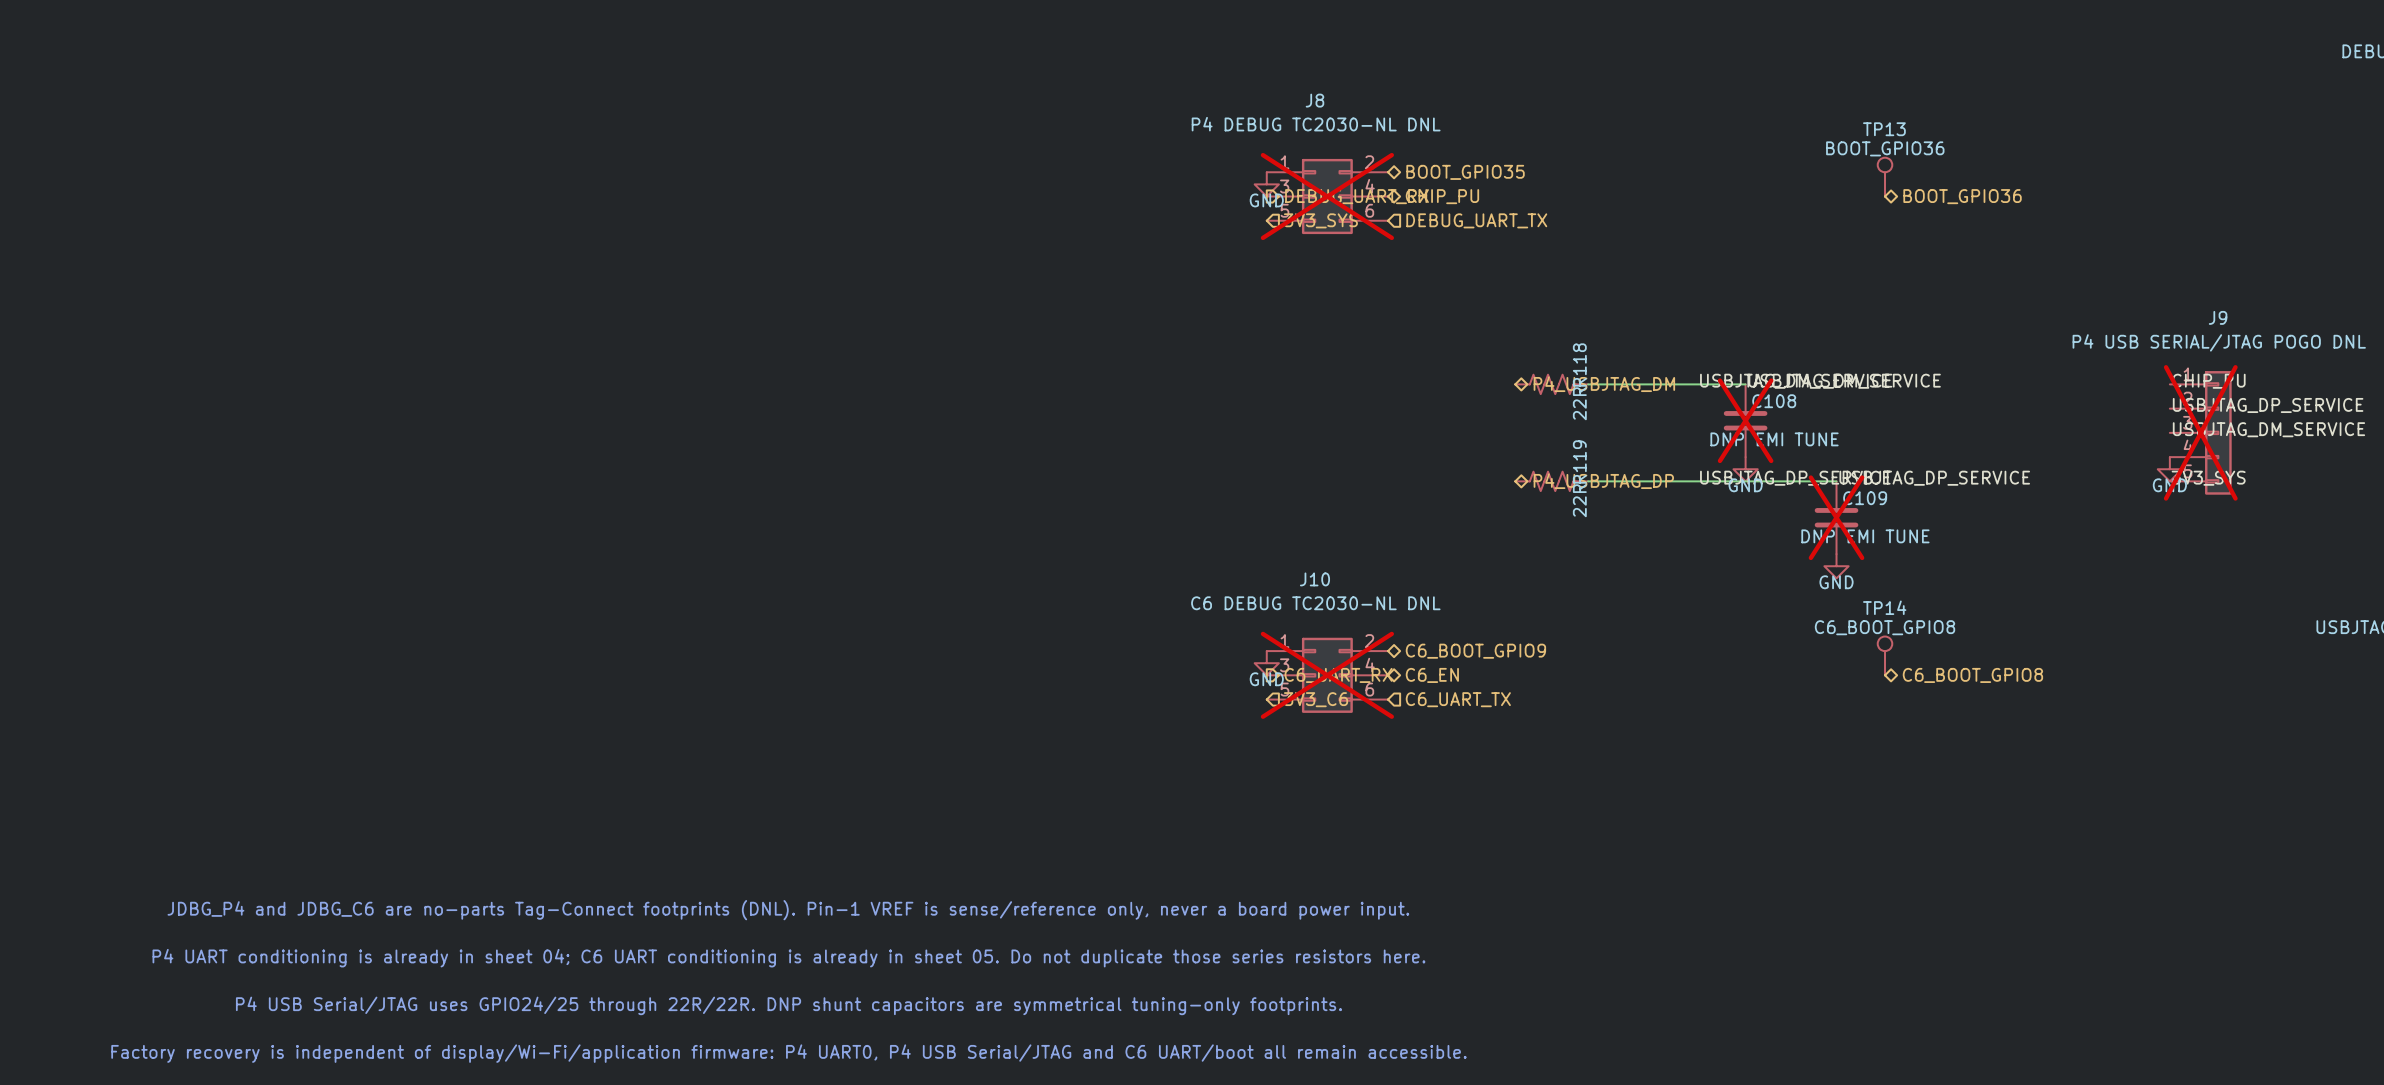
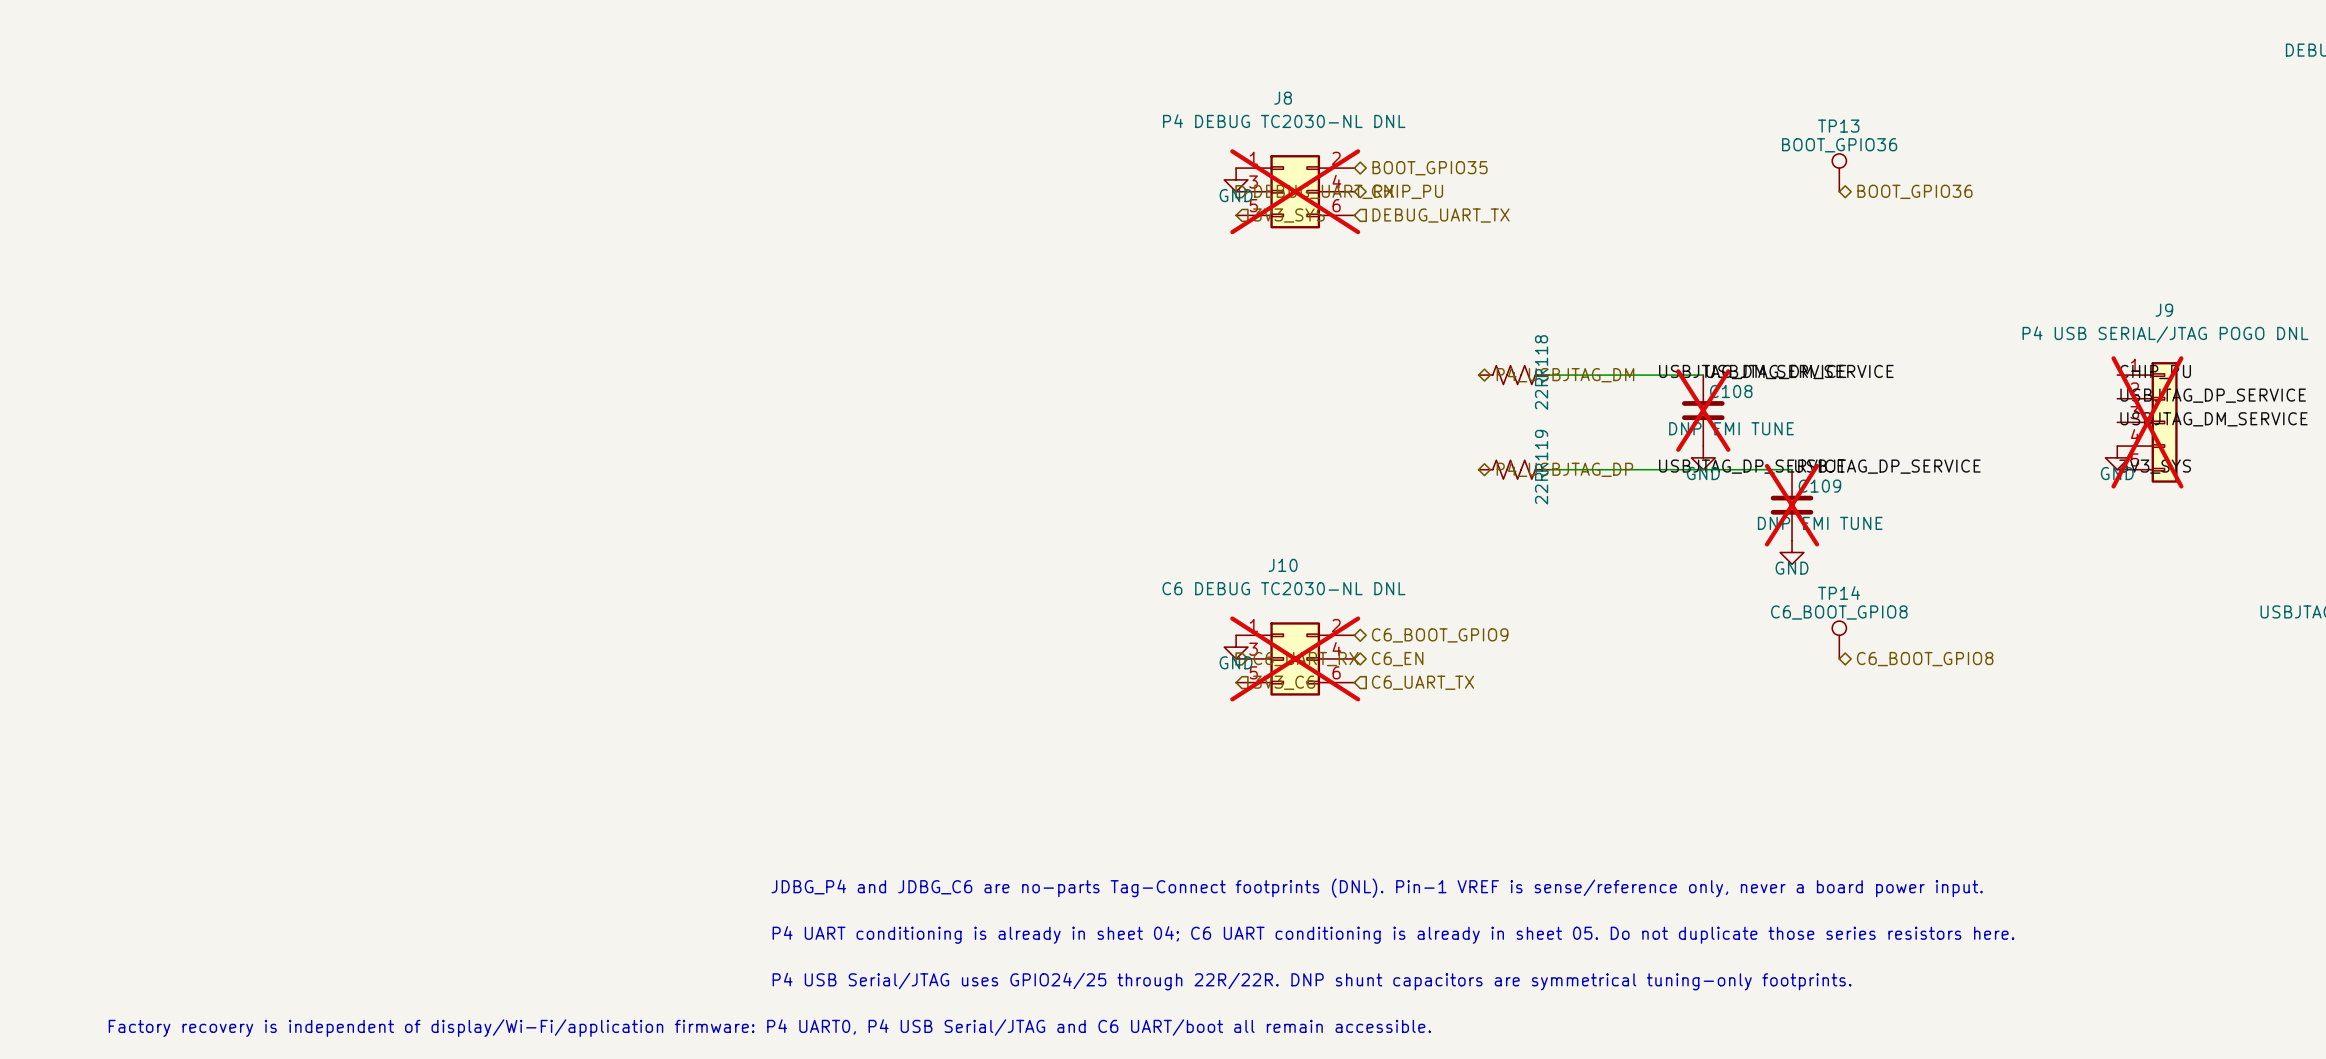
text position: JDBG_P4 and JDBG_C6 are no-parts Tag-Connect footprints (DNL). Pin-1 VREF is sense/reference only, never a board power input. (788, 910) -> JDBG_P4 and JDBG_C6 are no-parts Tag-Connect footprints (DNL). Pin-1 VREF is sense/reference only, never a board power input. (1377, 888)
text position: P4 UART conditioning is already in sheet 04; C6 UART conditioning is already in sheet 05. Do not duplicate those series resistors here. (788, 958) -> P4 UART conditioning is already in sheet 04; C6 UART conditioning is already in sheet 05. Do not duplicate those series resistors here. (1393, 934)
text position: P4 USB Serial/JTAG uses GPIO24/25 through 22R/22R. DNP shunt capacitors are symmetrical tuning-only footprints. (788, 1005) -> P4 USB Serial/JTAG uses GPIO24/25 through 22R/22R. DNP shunt capacitors are symmetrical tuning-only footprints. (1312, 981)

